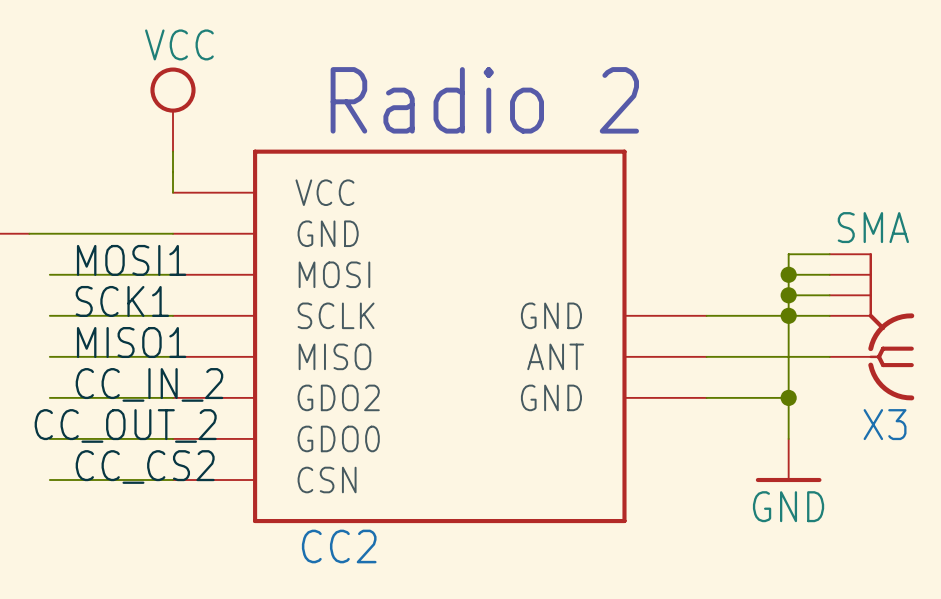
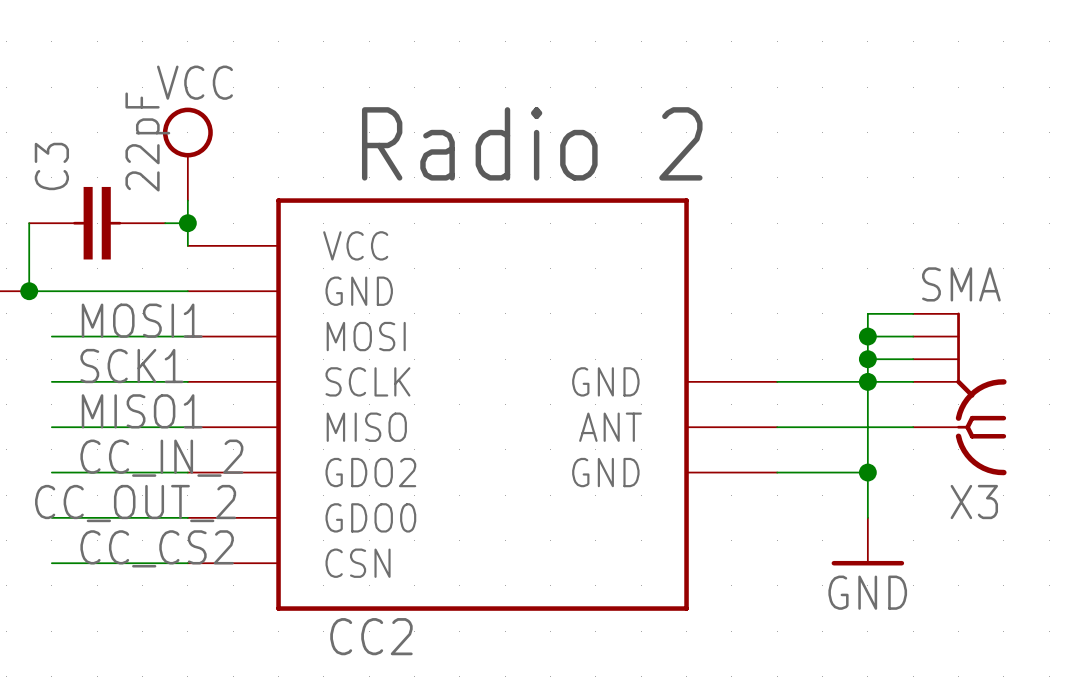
wire: none -> (29, 223) (29, 291)
C3: none -> 22pF (97, 223)
wire: none -> (165, 223) (187, 223)
junction: none -> (187, 223)
junction: none -> (29, 291)

